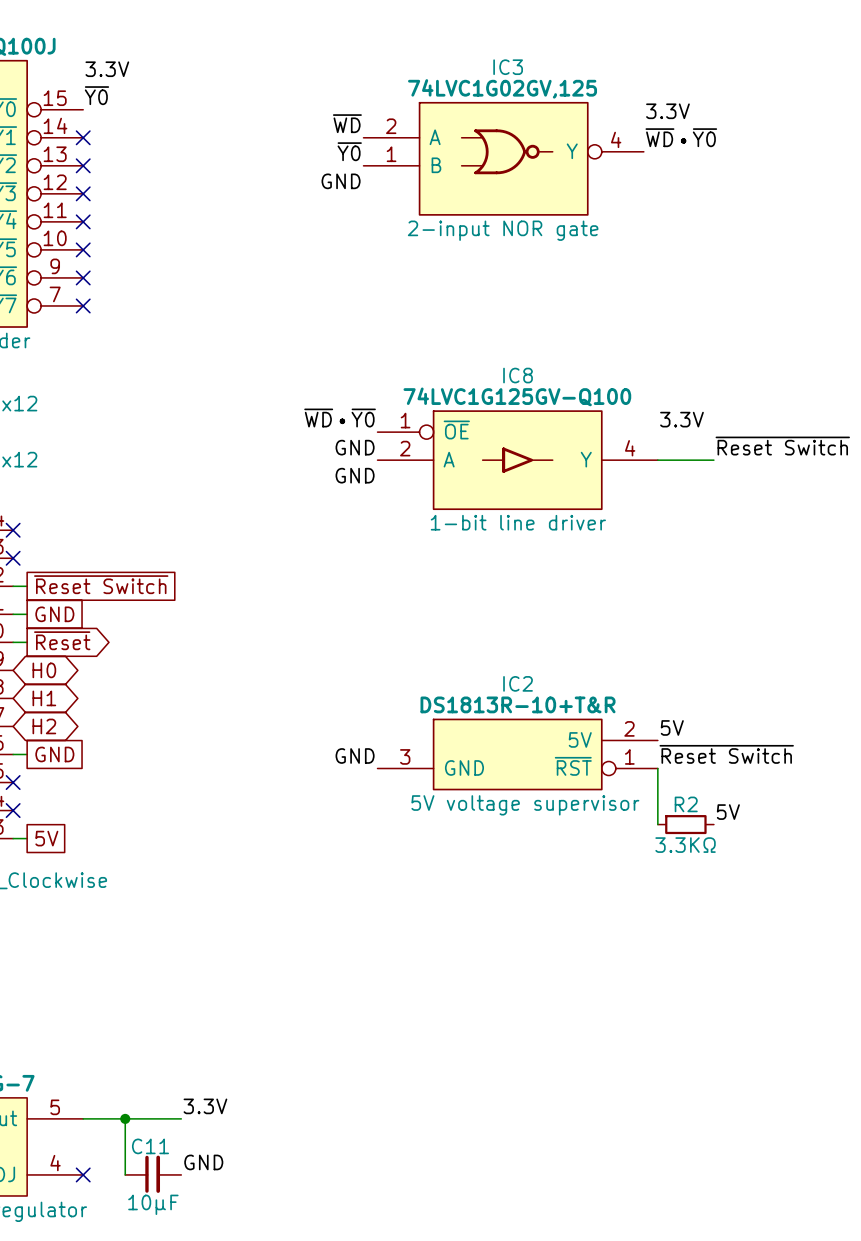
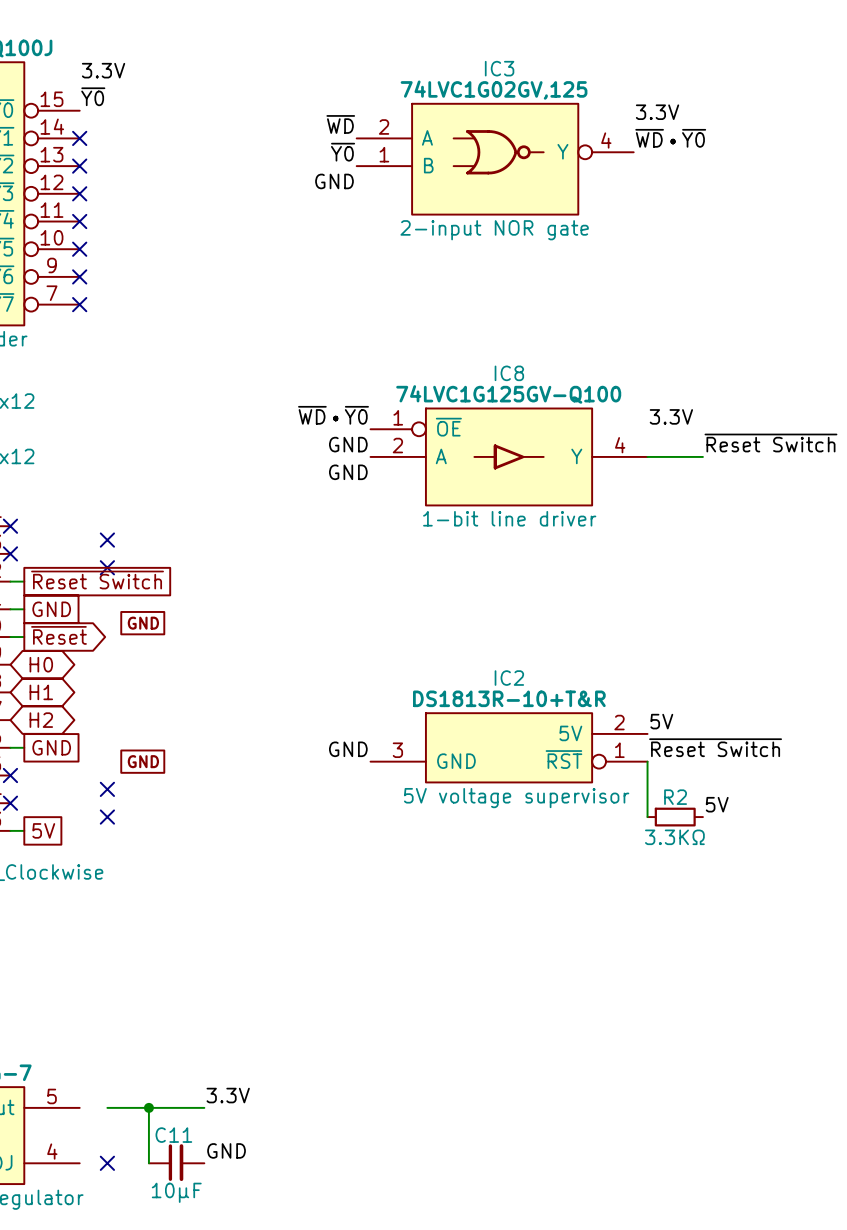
no-connect mark: none -> (107, 540)
no-connect mark: none -> (107, 567)
global label: none -> GND (143, 623)
global label: none -> GND (143, 761)
no-connect mark: none -> (107, 789)
no-connect mark: none -> (107, 817)
label position: 3.3V (205, 1106) -> 3.3V (228, 1095)
wire: (83, 1118) (111, 1118) -> (176, 1107) (204, 1107)
wire: (125, 1118) (125, 1174) -> (148, 1107) (148, 1163)
junction position: (125, 1118) -> (148, 1107)
label position: GND (203, 1162) -> GND (226, 1150)
no-connect mark position: (83, 1174) -> (107, 1163)
C11 position: (153, 1174) -> (176, 1162)

